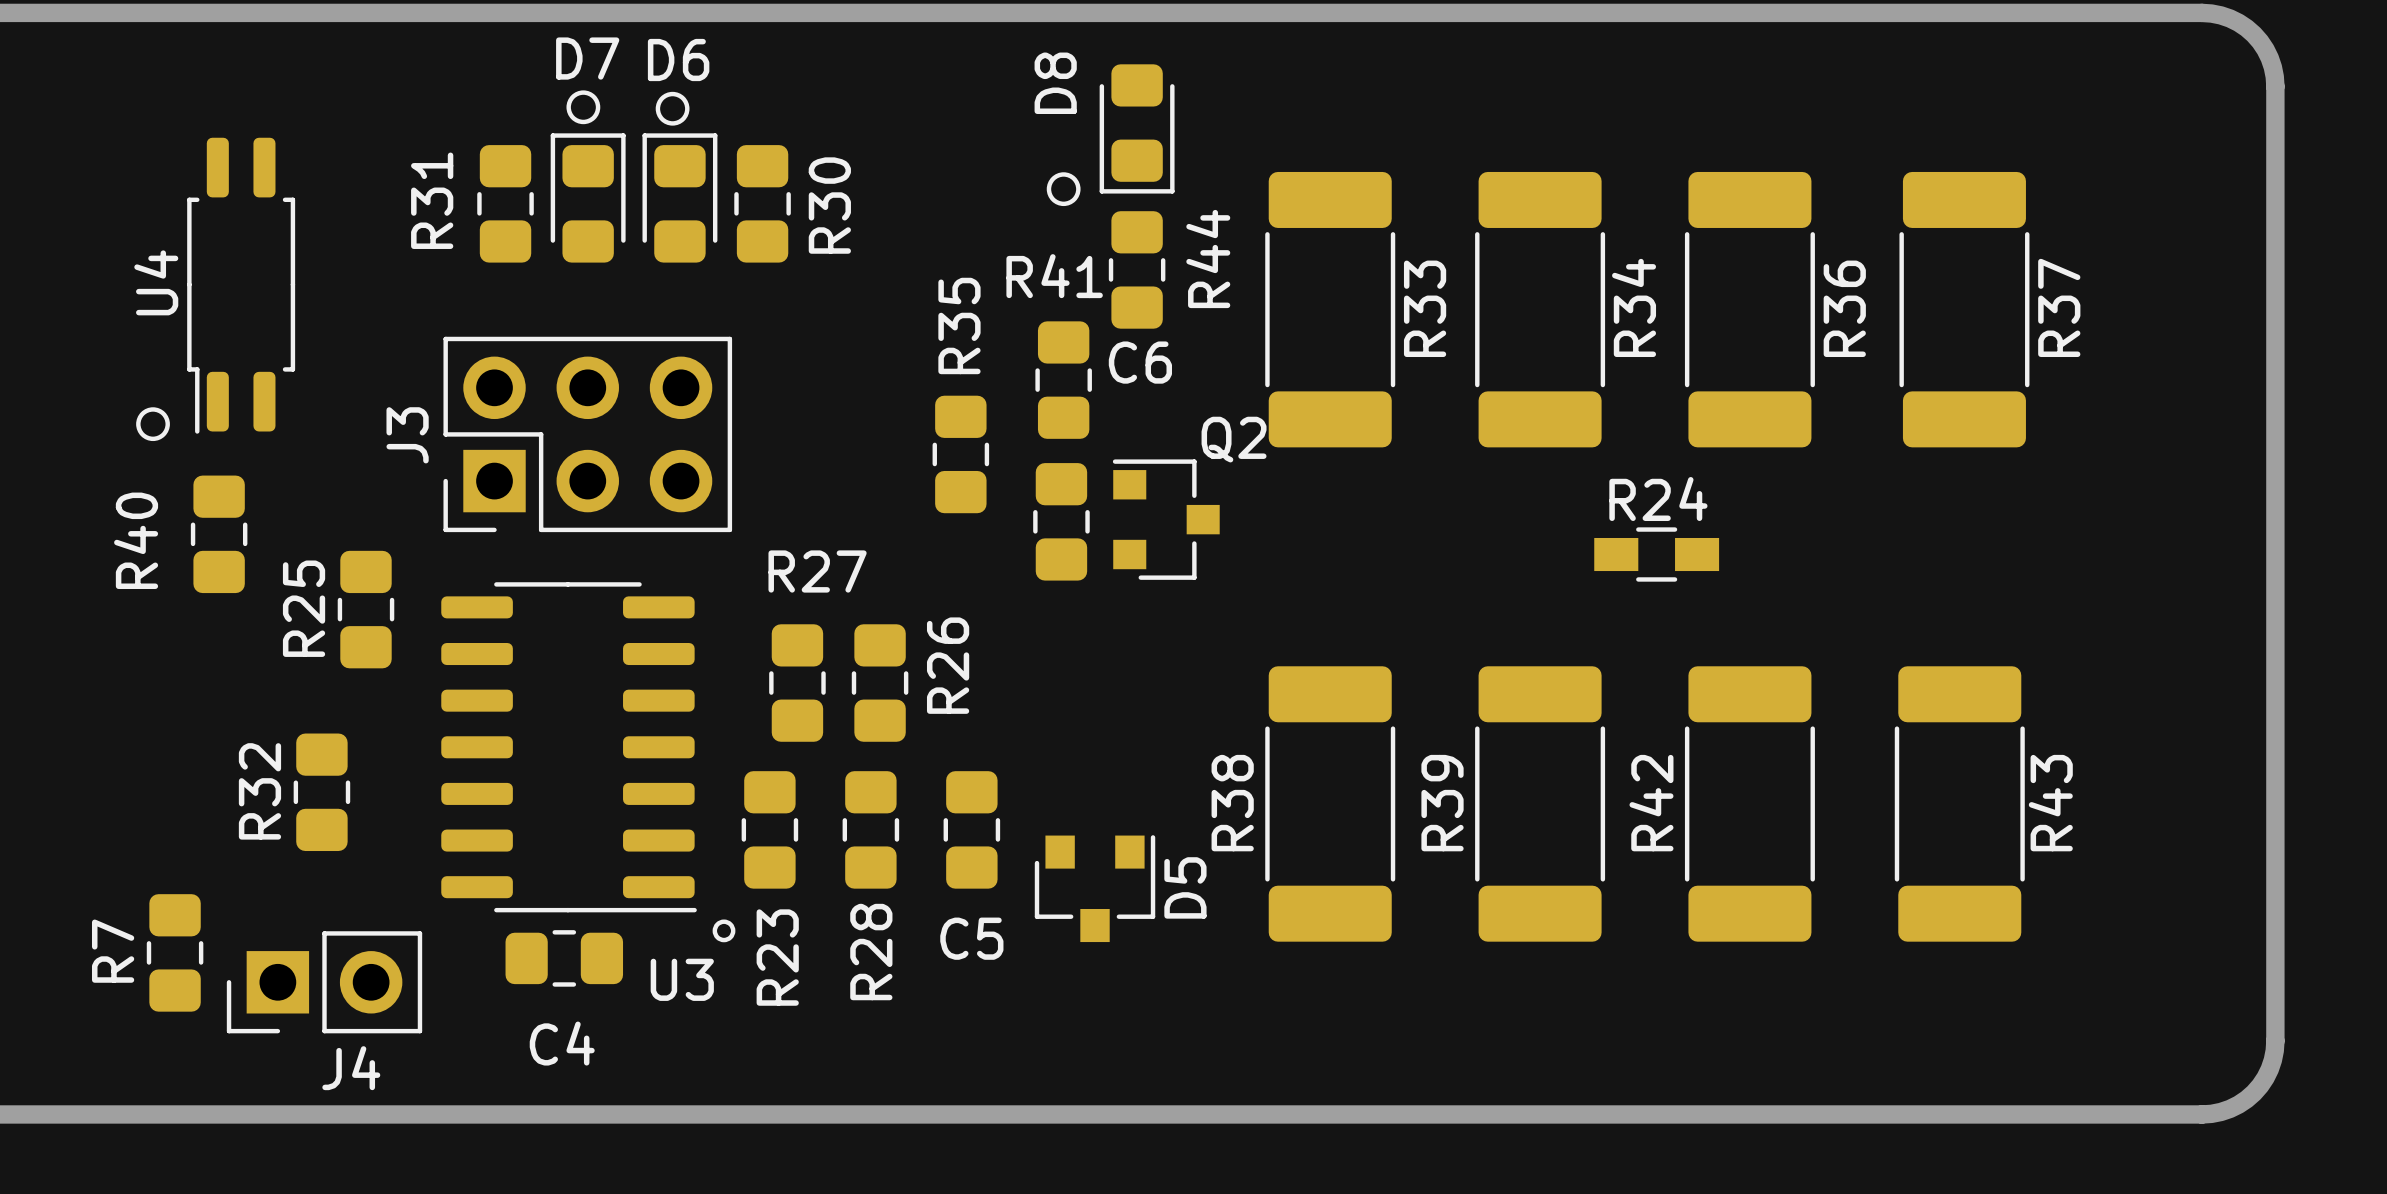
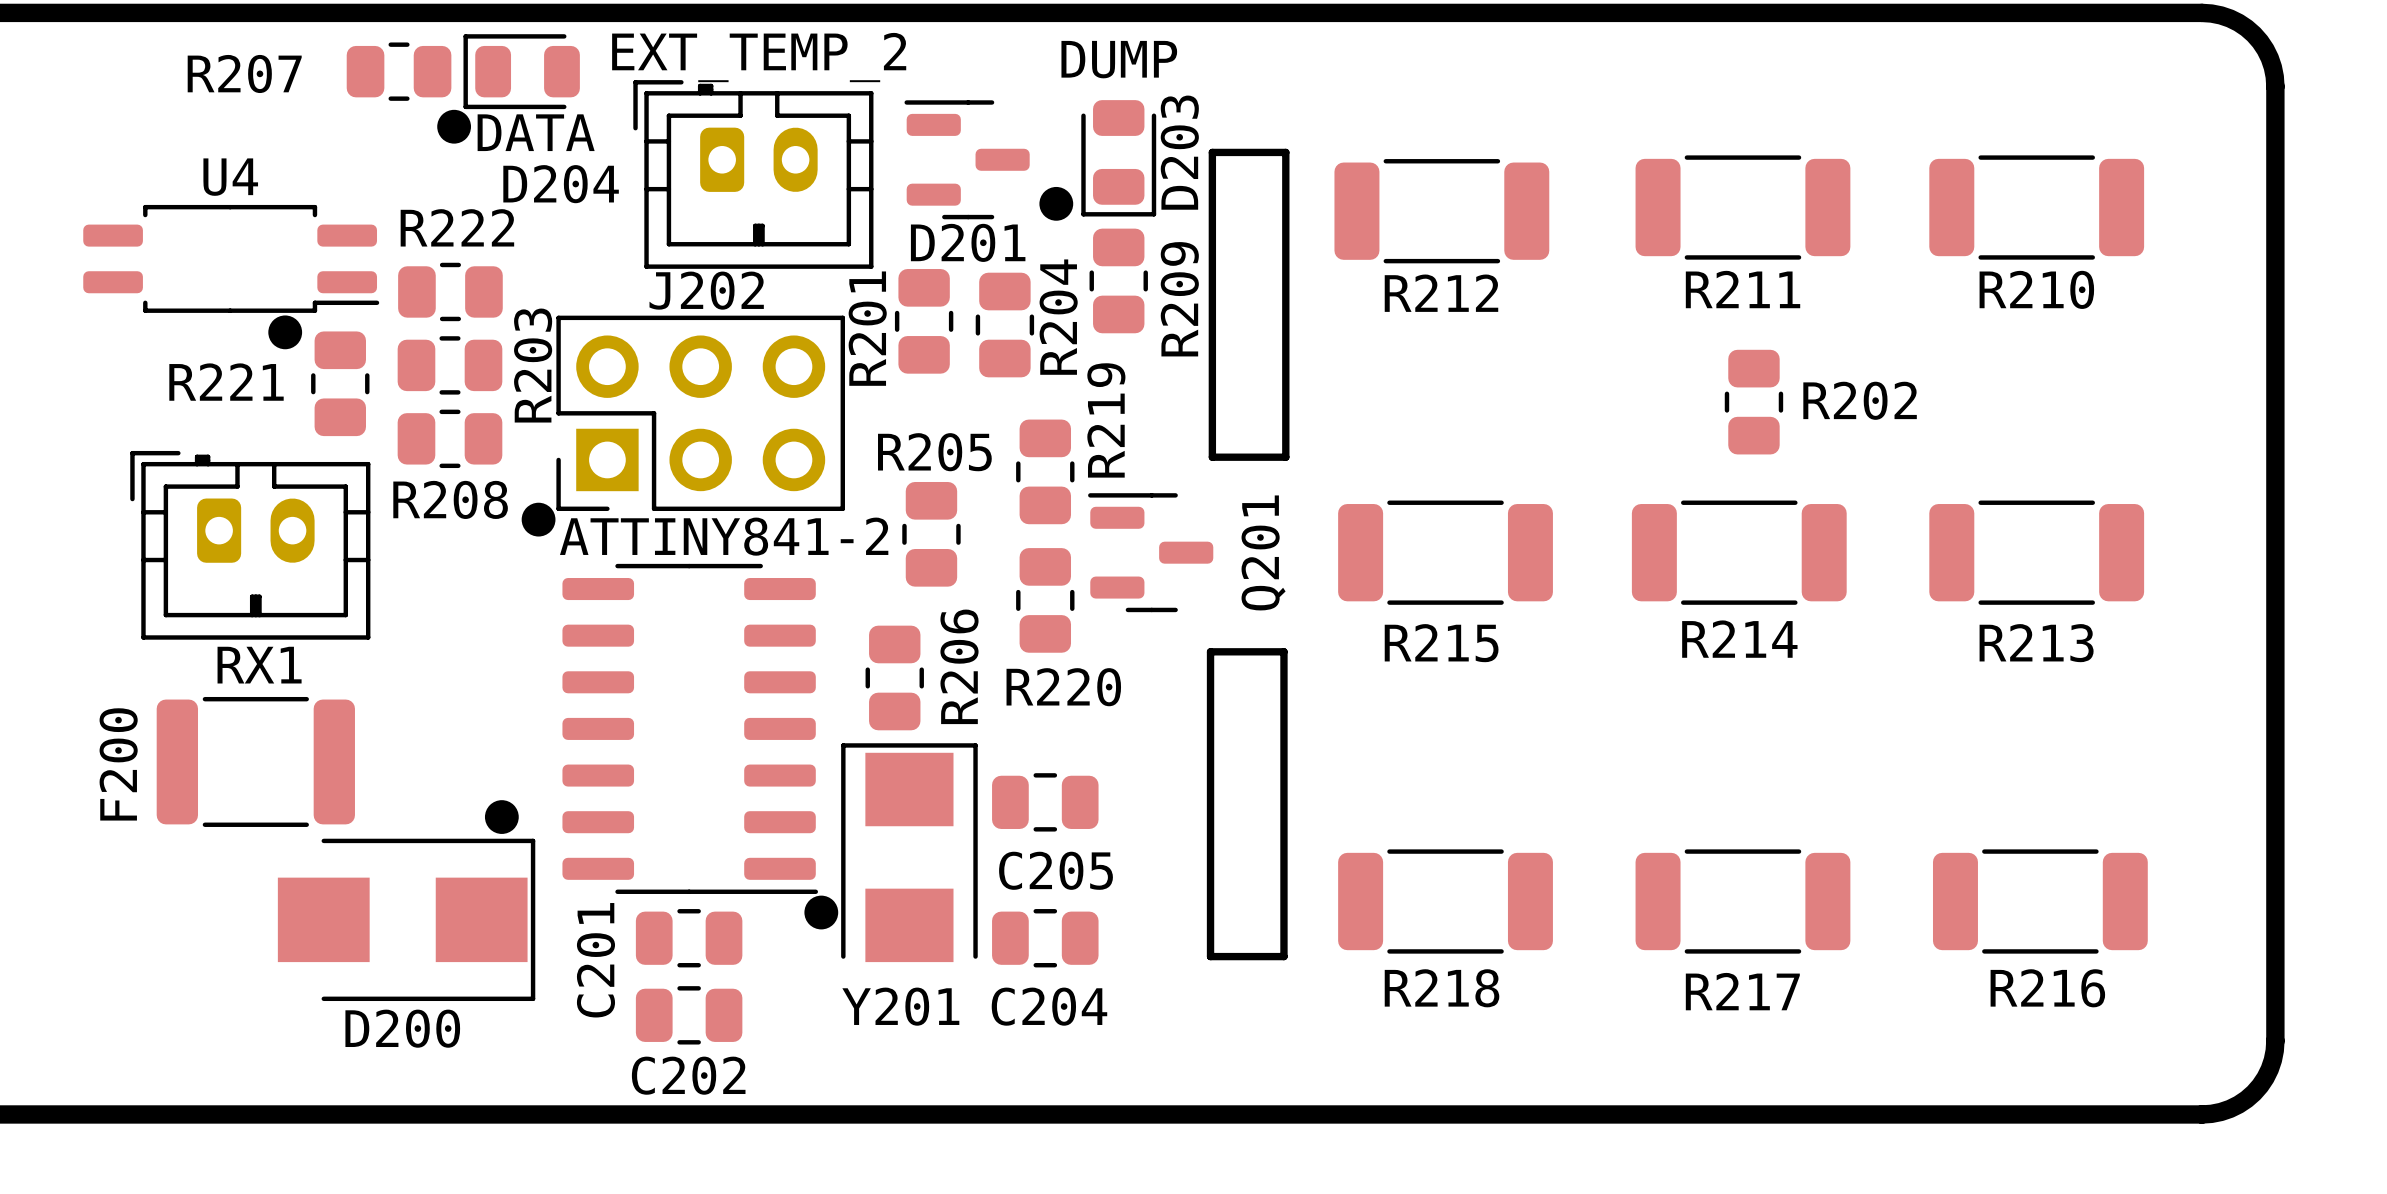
R207: none -> (399, 71)
D204: none -> DATA (521, 71)
drawing: [566, 90, 601, 125] -> none
drawing: [655, 91, 690, 126] -> none
drawing: none -> [437, 109, 472, 144]
D8: (1137, 128) -> none
board edge: none -> (1212, 152) (1285, 152) (1285, 457) (1212, 457) (1212, 152)
D203: none -> DUMP (1118, 158)
D201: none -> (967, 159)
drawing shape: [1046, 172, 1081, 207] -> [1039, 186, 1074, 221]
EXT_TEMP_2: none -> (753, 174)
D7: (588, 197) -> none
D6: (679, 197) -> none
R31: (505, 203) -> none
R30: (762, 203) -> none
R211: none -> (1742, 207)
R210: none -> (2036, 207)
R212: none -> (1441, 211)
R44: (1137, 269) -> none
R209: none -> (1118, 280)
U4 name position: U4 (156, 282) -> U4 (230, 177)
U4 rotation: 0° (241, 285) -> 90° counterclockwise (231, 258)
R222: none -> (450, 291)
R33: (1330, 309) -> none
R34: (1540, 309) -> none
R36: (1749, 309) -> none
R37: (1964, 309) -> none
drawing: none -> [268, 315, 303, 350]
R201: none -> (924, 321)
R204: none -> (1004, 325)
R203: none -> (449, 365)
R41: (1063, 380) -> none
R221: none -> (340, 383)
R202: none -> (1753, 402)
drawing: [136, 407, 170, 442] -> none
J202: none -> (700, 413)
J3: (587, 434) -> none
R208: none -> (449, 438)
R35: (960, 454) -> none
R219: none -> (1045, 471)
drawing: none -> [521, 502, 556, 537]
Q2: (1166, 519) -> none
C6: (1061, 521) -> none
R40: (219, 534) -> none
R205: none -> (931, 534)
RX1: none -> (250, 545)
Q201: none -> (1150, 552)
R215: none -> (1445, 552)
R214: none -> (1739, 552)
R213: none -> (2036, 552)
R24: (1656, 554) -> none
R220: none -> (1045, 600)
R25: (365, 609) -> none
board edge: none -> (1210, 651) (1283, 651) (1283, 956) (1210, 956) (1210, 651)
R206: none -> (894, 677)
R27: (797, 683) -> none
R26: (880, 683) -> none
ATTINY841-2: none -> (690, 728)
U3: (569, 747) -> none
F200: none -> (255, 761)
R32: (321, 792) -> none
drawing: none -> [484, 800, 519, 834]
C205: none -> (1045, 802)
R38: (1330, 803) -> none
R39: (1540, 803) -> none
R42: (1749, 803) -> none
R43: (1959, 803) -> none
R23: (769, 829) -> none
R28: (870, 829) -> none
C5: (971, 829) -> none
Y201: none -> (909, 852)
D5: (1095, 888) -> none
drawing: none -> [804, 895, 839, 930]
R218: none -> (1445, 901)
R217: none -> (1742, 901)
R216: none -> (2040, 901)
D200: none -> (406, 919)
drawing: [712, 919, 736, 943] -> none
C201: none -> (689, 938)
C204: none -> (1045, 938)
R7: (175, 952) -> none
C4: (564, 958) -> none
J4: (324, 982) -> none
C202: none -> (689, 1015)

